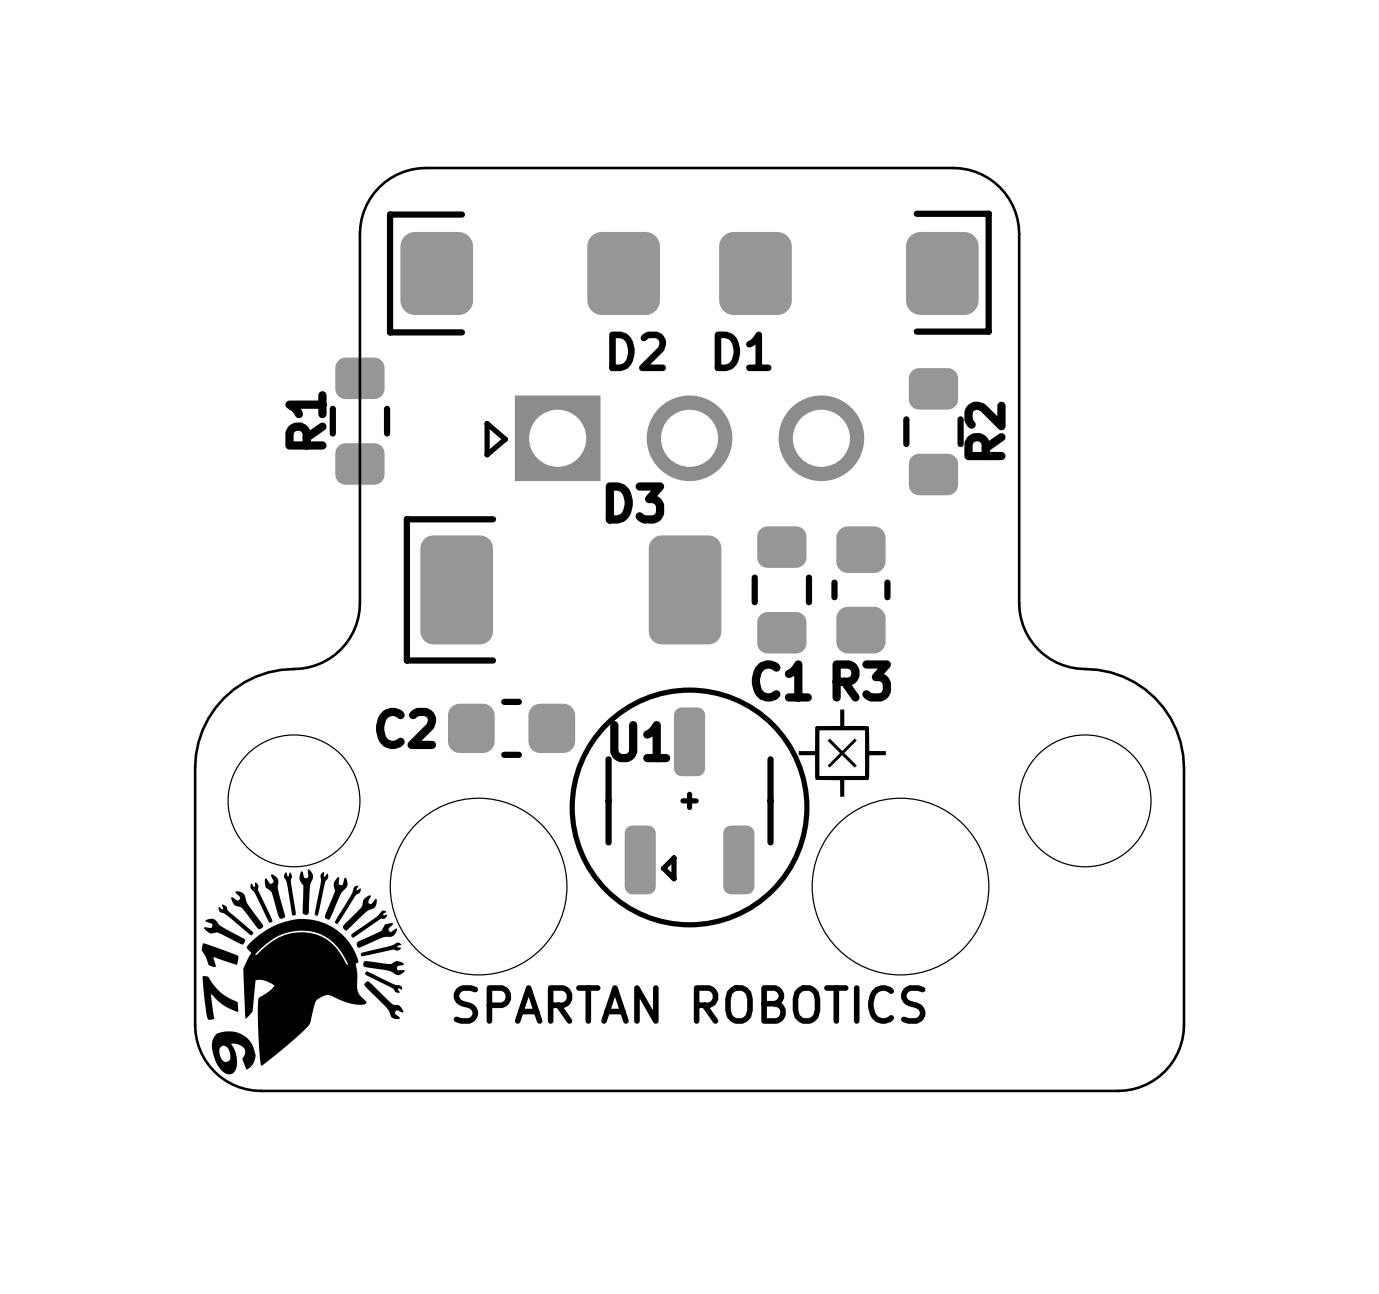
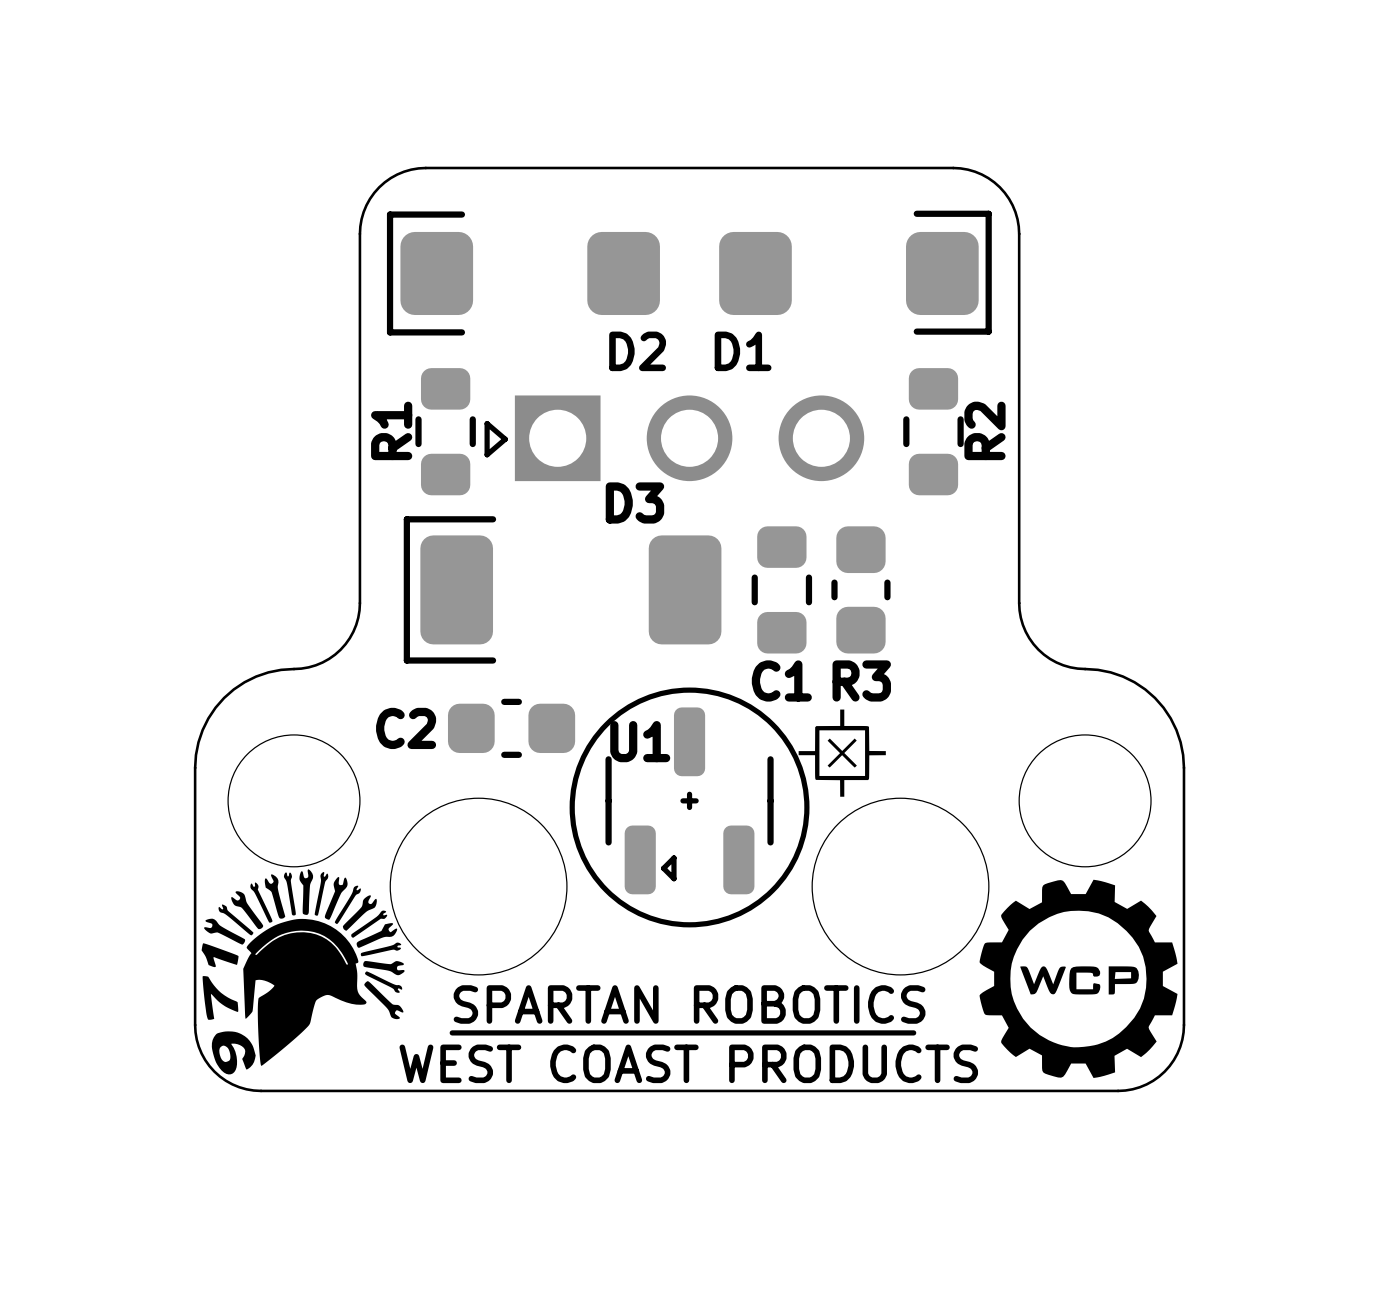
R1 position: (359, 421) -> (445, 431)
drawing: none -> [979, 879, 1178, 1078]
line: none -> (452, 1032) (913, 1032)
text: none -> WEST COAST PRODUCTS (688, 1063)

